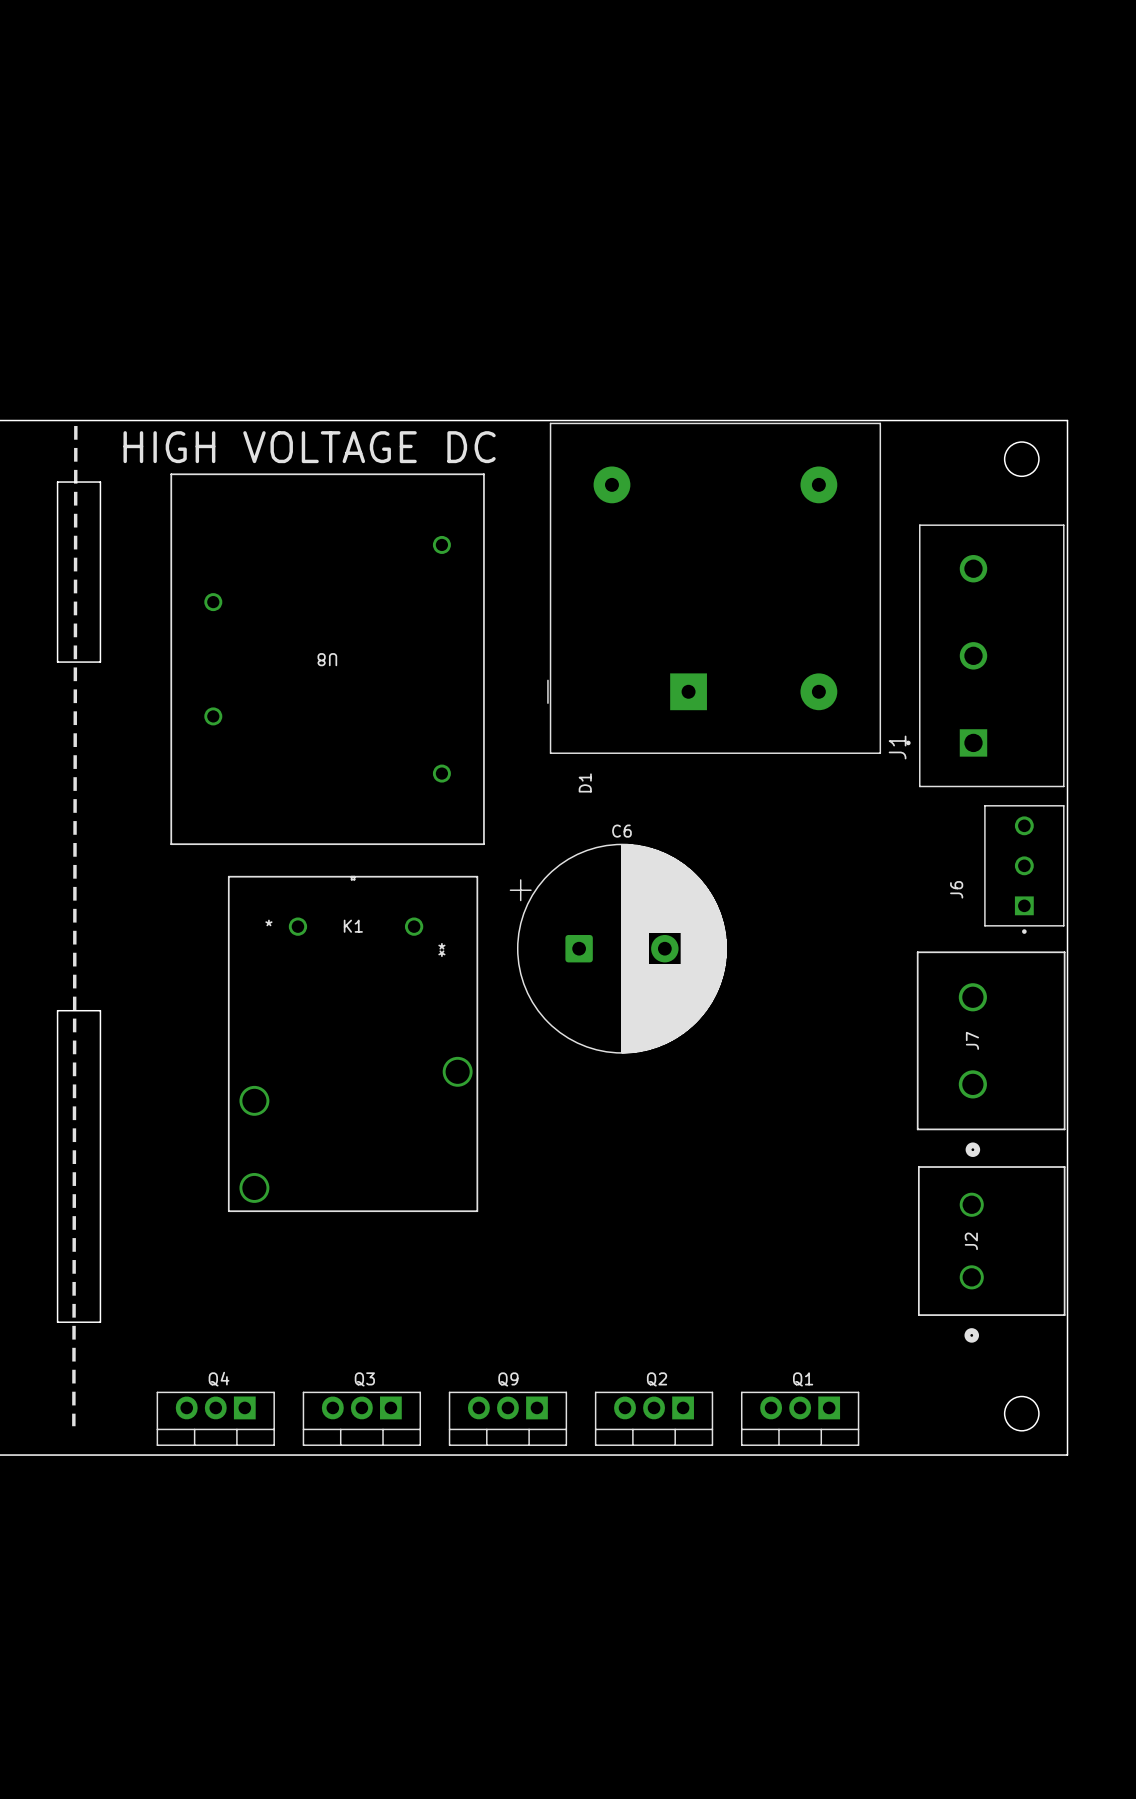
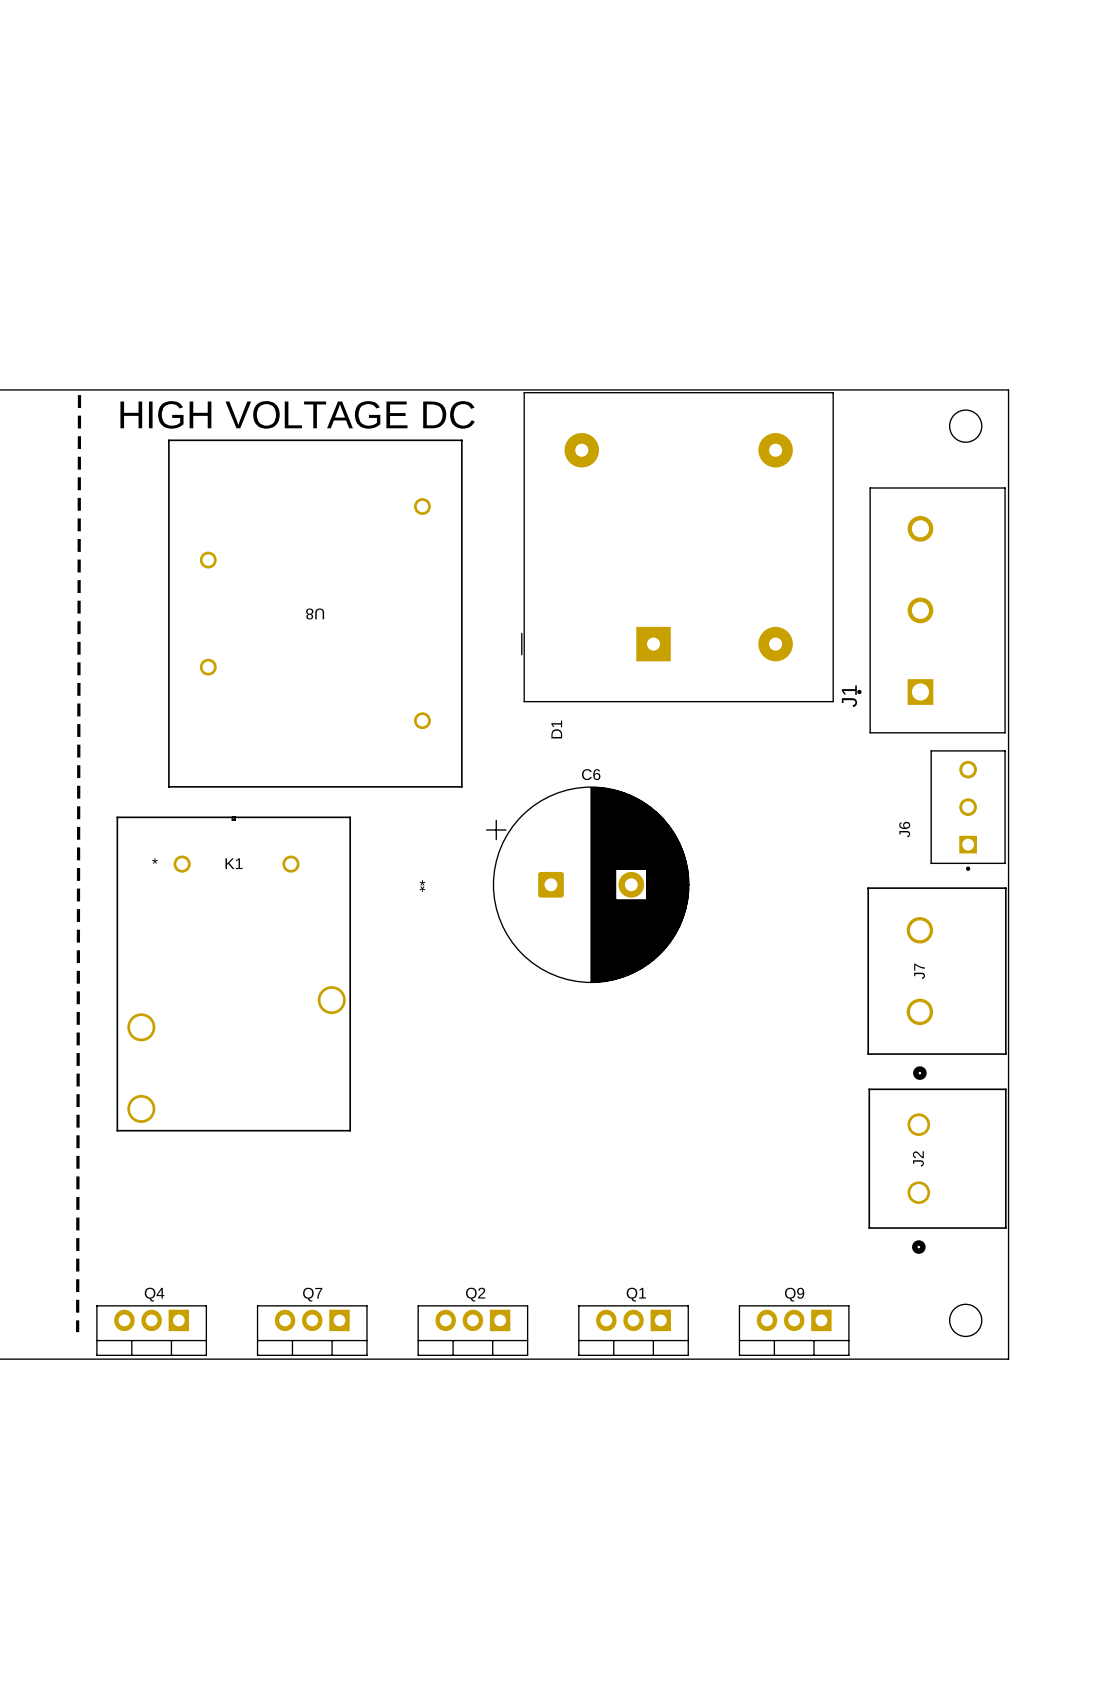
board edge: (57, 482) (57, 662) (100, 662) (100, 482) (57, 482) -> none
board edge: (57, 1010) (100, 1010) (100, 1322) (57, 1322) (57, 1010) -> none
K1 position: (353, 1043) -> (233, 974)
Q4 position: (215, 1418) -> (151, 1330)
Q3: (361, 1418) -> none
Q9 position: (507, 1418) -> (794, 1330)
Q2 position: (654, 1418) -> (472, 1330)
Q1 position: (800, 1418) -> (633, 1330)
Q7: none -> (312, 1330)

